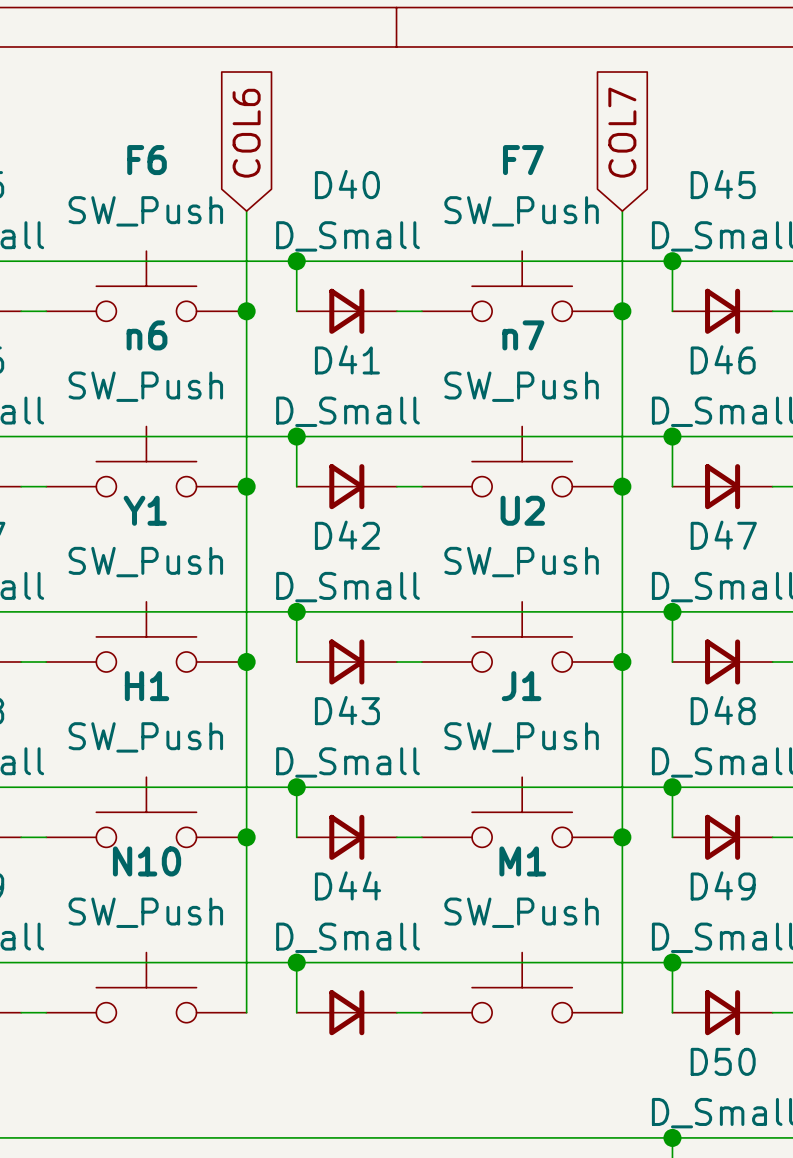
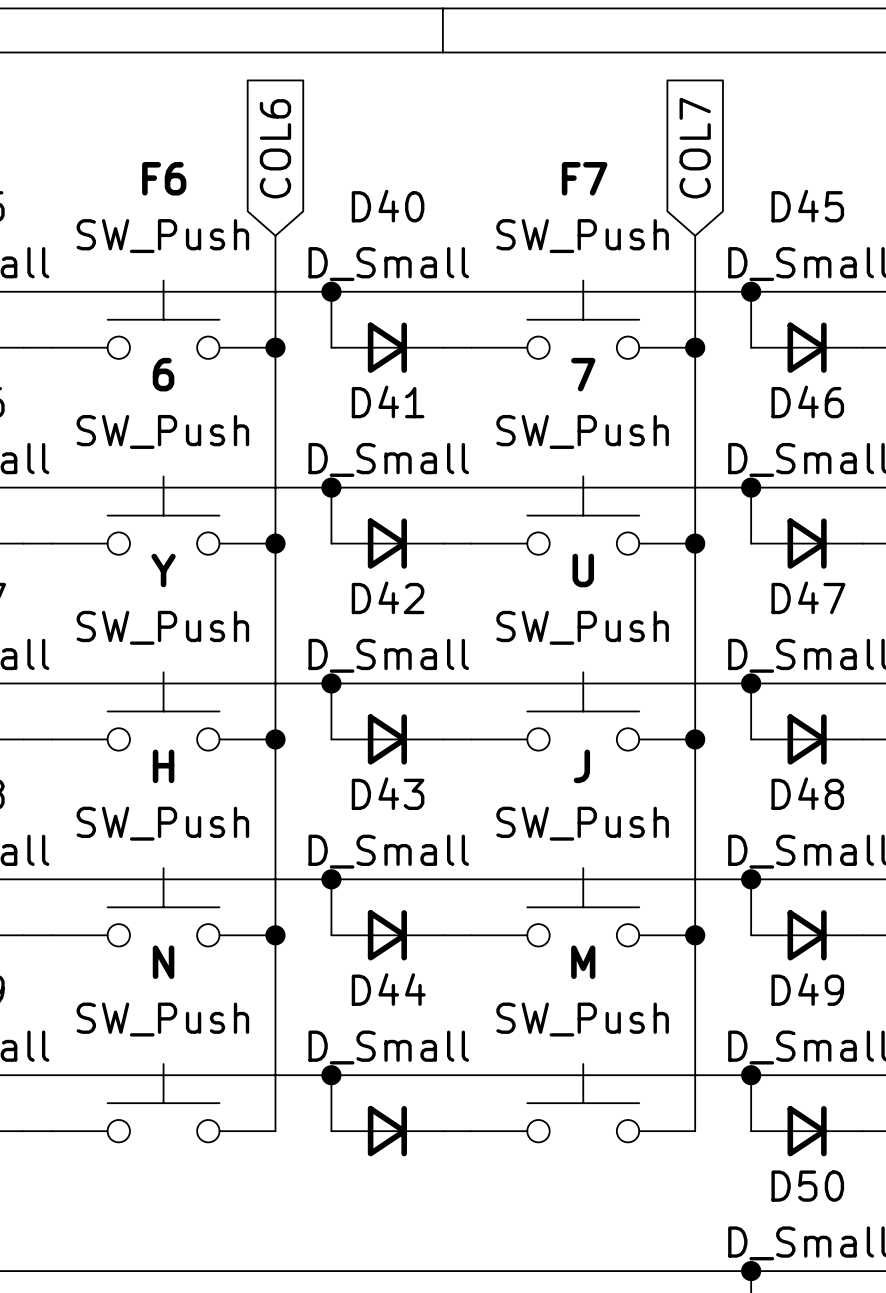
n6 name: n6 (147, 335) -> 6 (163, 374)
n7 name: n7 (523, 335) -> 7 (583, 374)
Y1 name: Y1 (145, 510) -> Y (163, 570)
U2 name: U2 (522, 510) -> U (583, 570)
H1 name: H1 (147, 686) -> H (163, 766)
J1 name: J1 (521, 686) -> J (581, 766)
N10 name: N10 (147, 861) -> N (163, 962)
M1 name: M1 (522, 861) -> M (583, 962)

